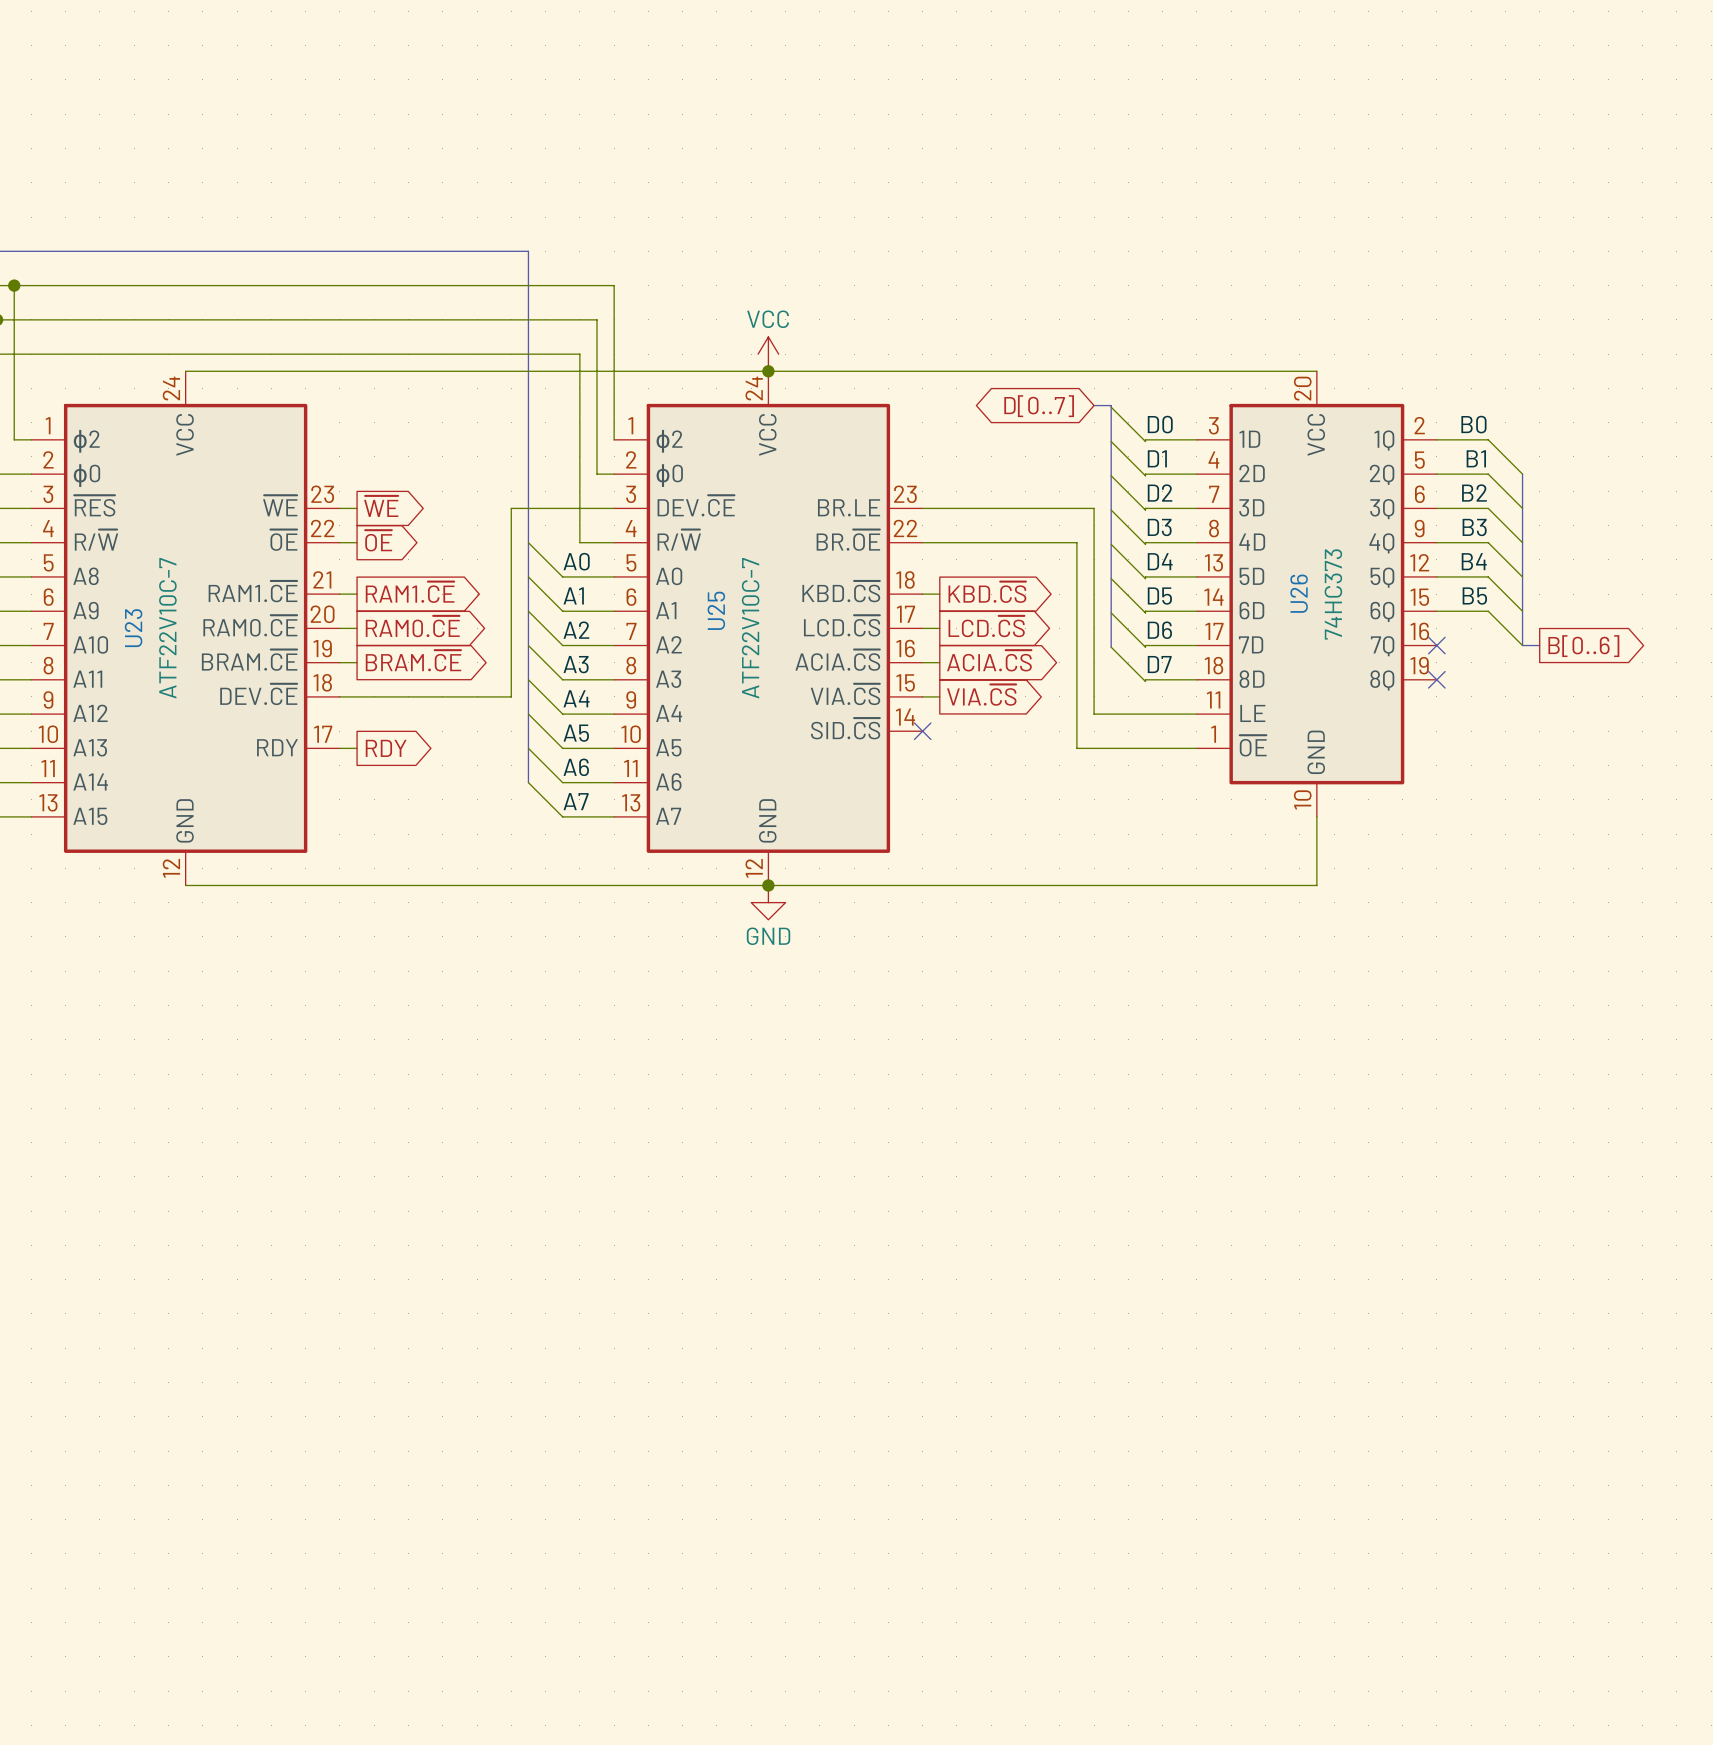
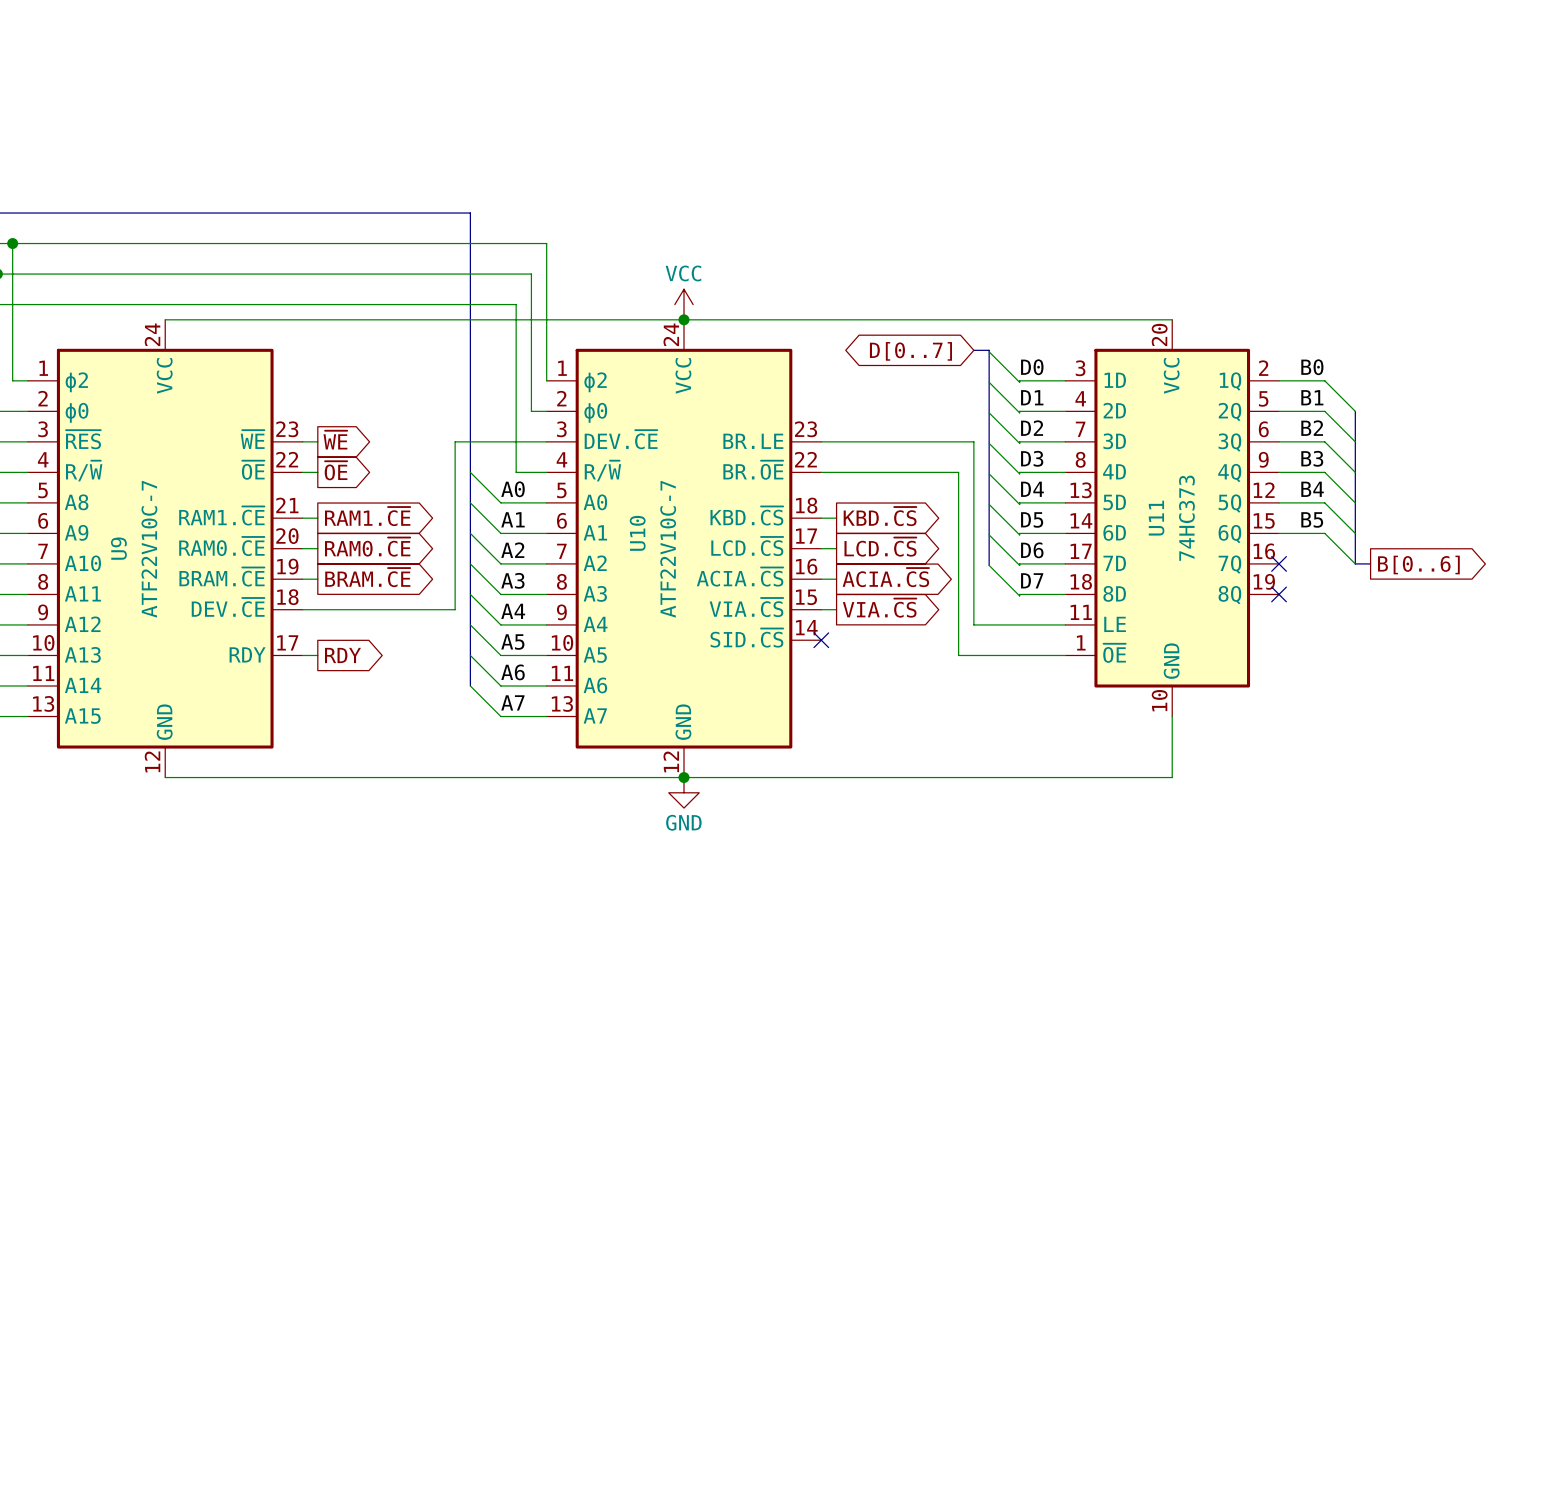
U26 name: U26 (1299, 593) -> U11 (1156, 518)
U25 name: U25 (716, 610) -> U10 (637, 533)
U23 name: U23 (133, 628) -> U9 (118, 548)

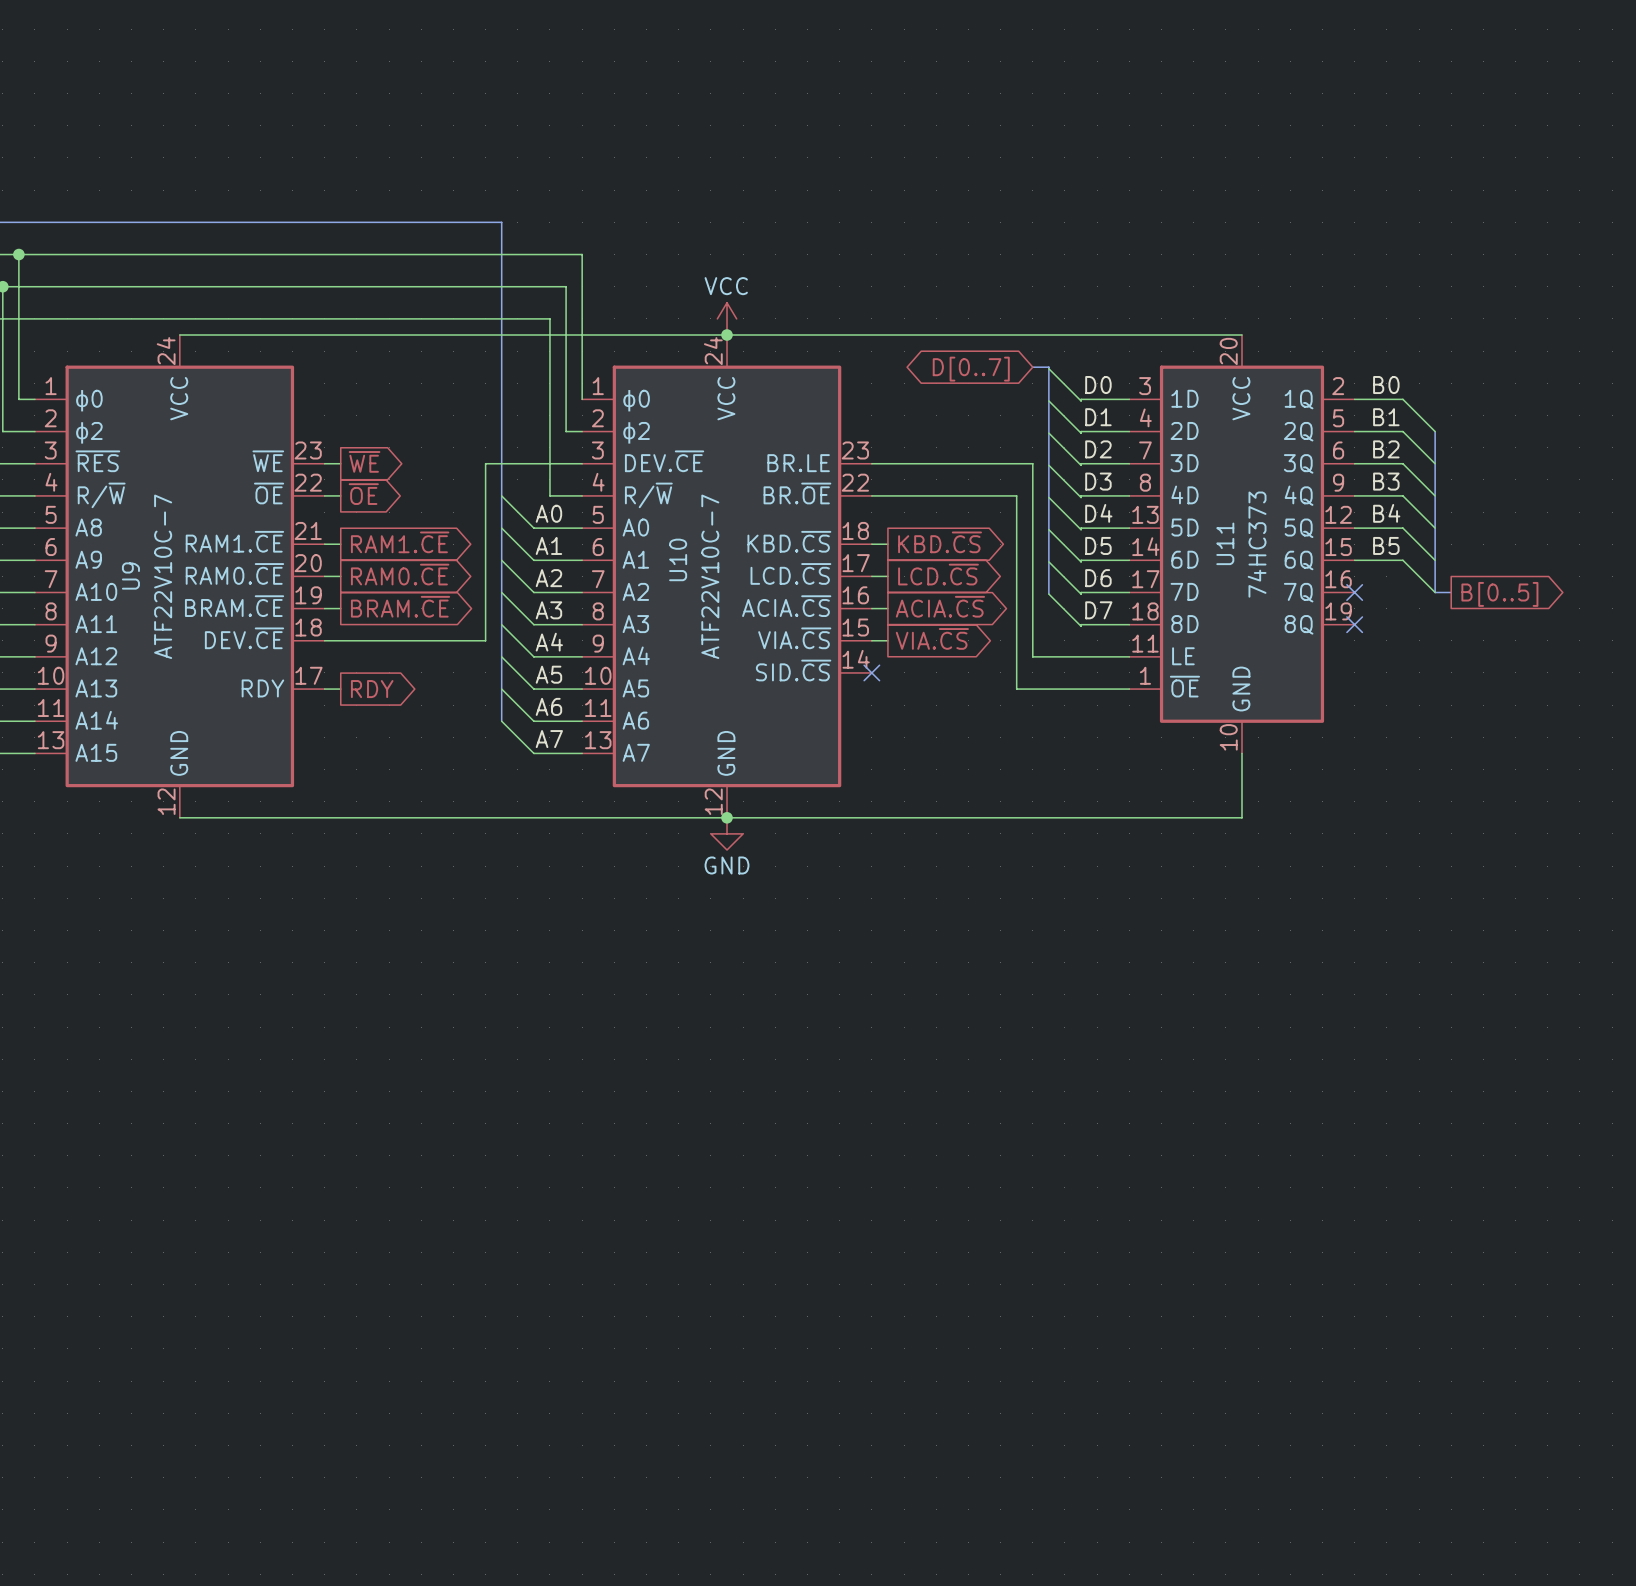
U9 pin name: ϕ2 (76, 382) -> ϕ0 (88, 400)
U10 pin name: ϕ2 (595, 382) -> ϕ0 (636, 400)
U9 pin name: ϕ0 (77, 412) -> ϕ2 (88, 432)
U10 pin name: ϕ0 (595, 412) -> ϕ2 (636, 432)
global label: B[0..6] (1418, 564) -> B[0..5] (1499, 594)

